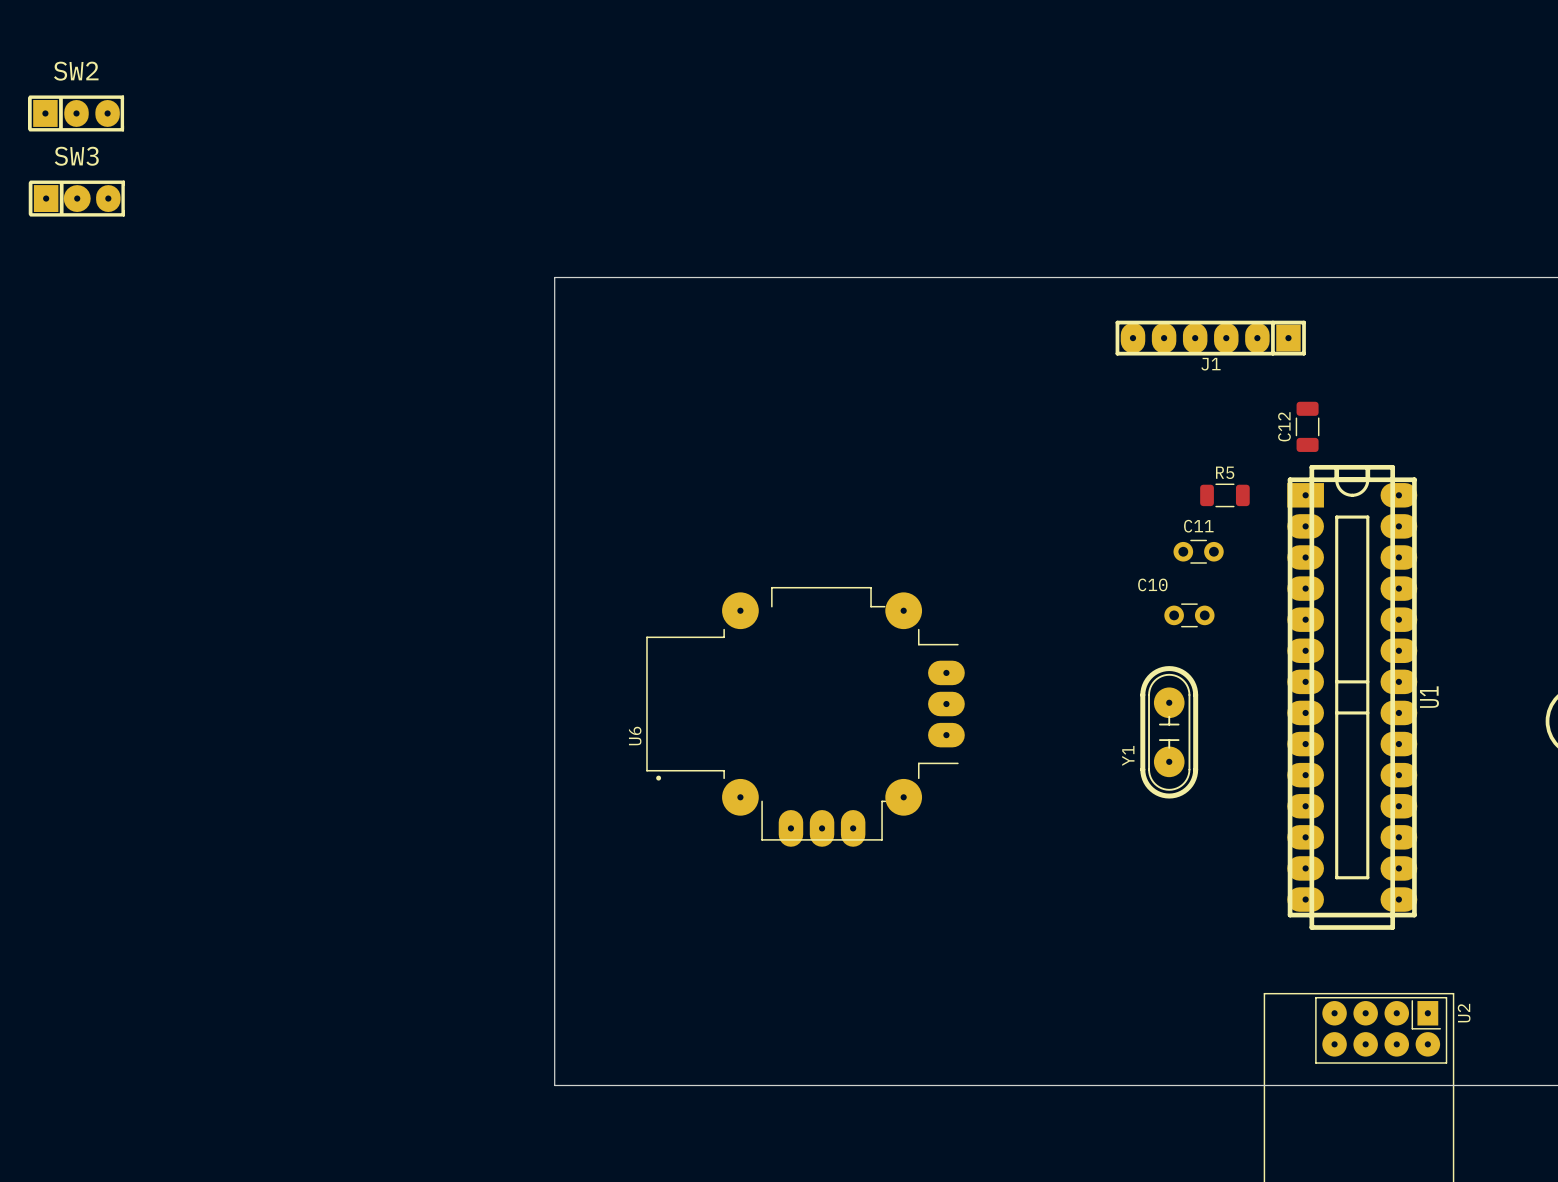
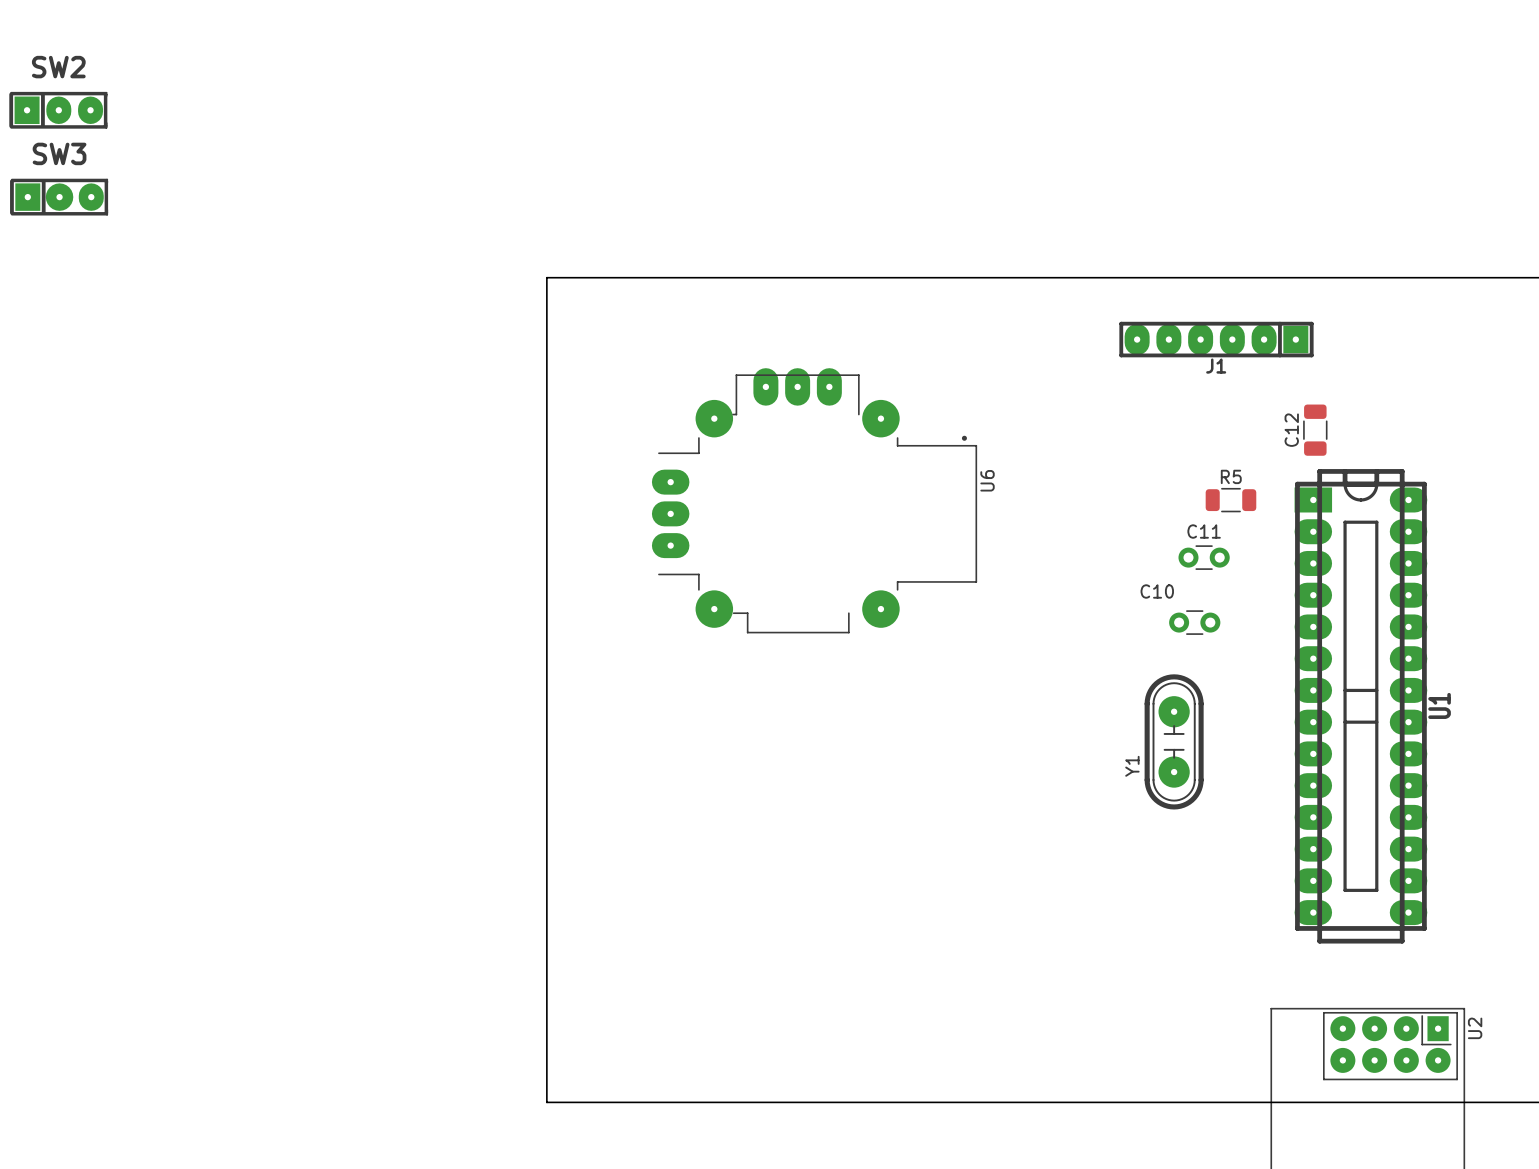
U6 rotation: 0° (805, 716) -> 180° (814, 500)
U6 position: (805, 716) -> (814, 500)

